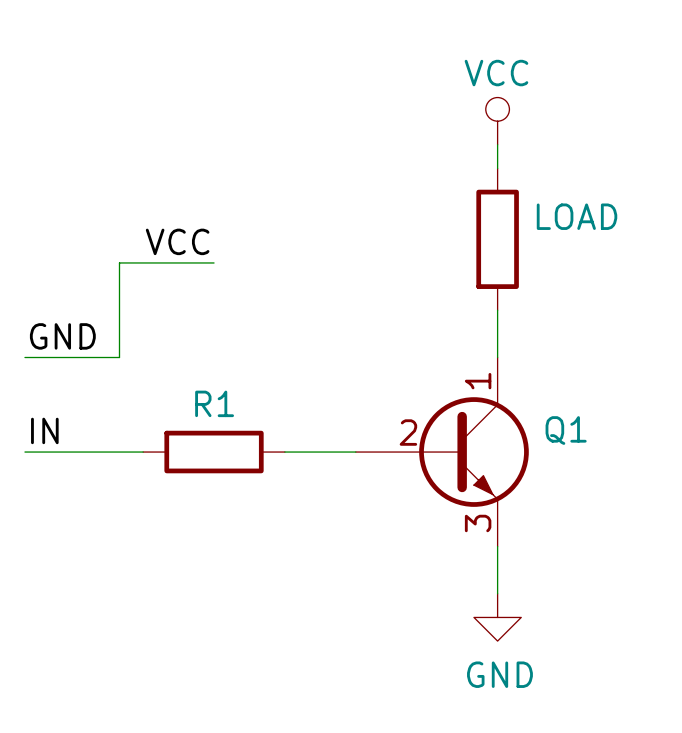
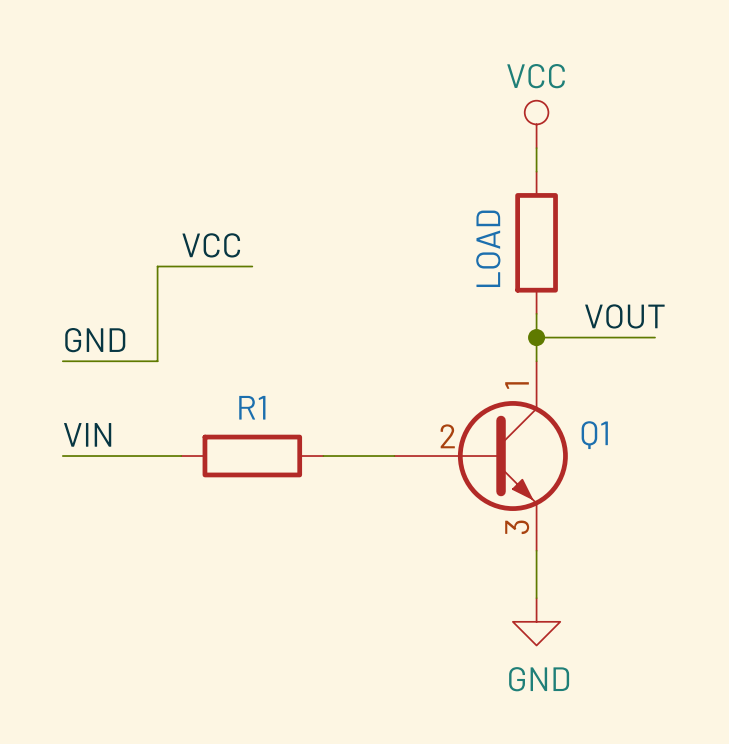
LOAD name rotation: 0° (577, 216) -> 90° counterclockwise (488, 248)
LOAD name position: LOAD (577, 216) -> LOAD (488, 248)
label: none -> VOUT (624, 316)
wire: none -> (536, 337) (655, 337)
junction: none -> (536, 337)
label: IN (44, 430) -> VIN (87, 434)

